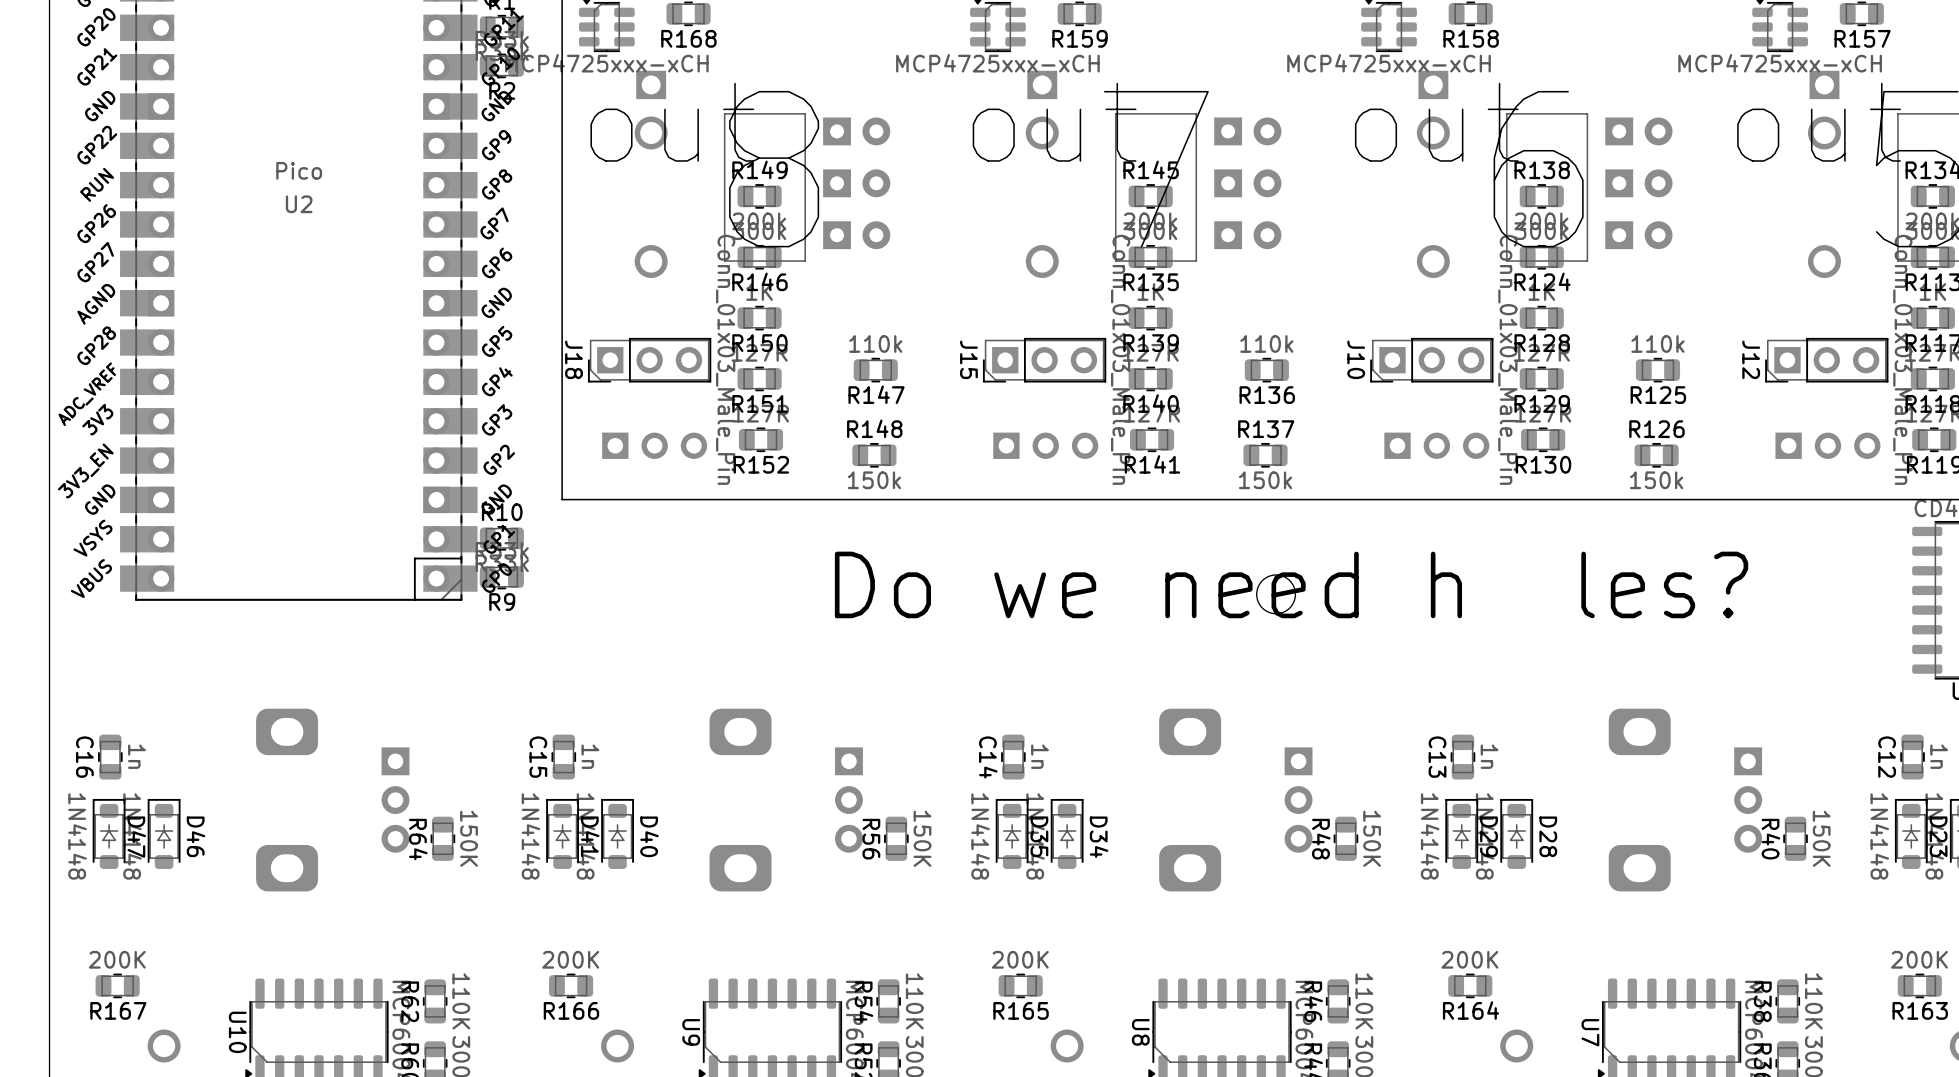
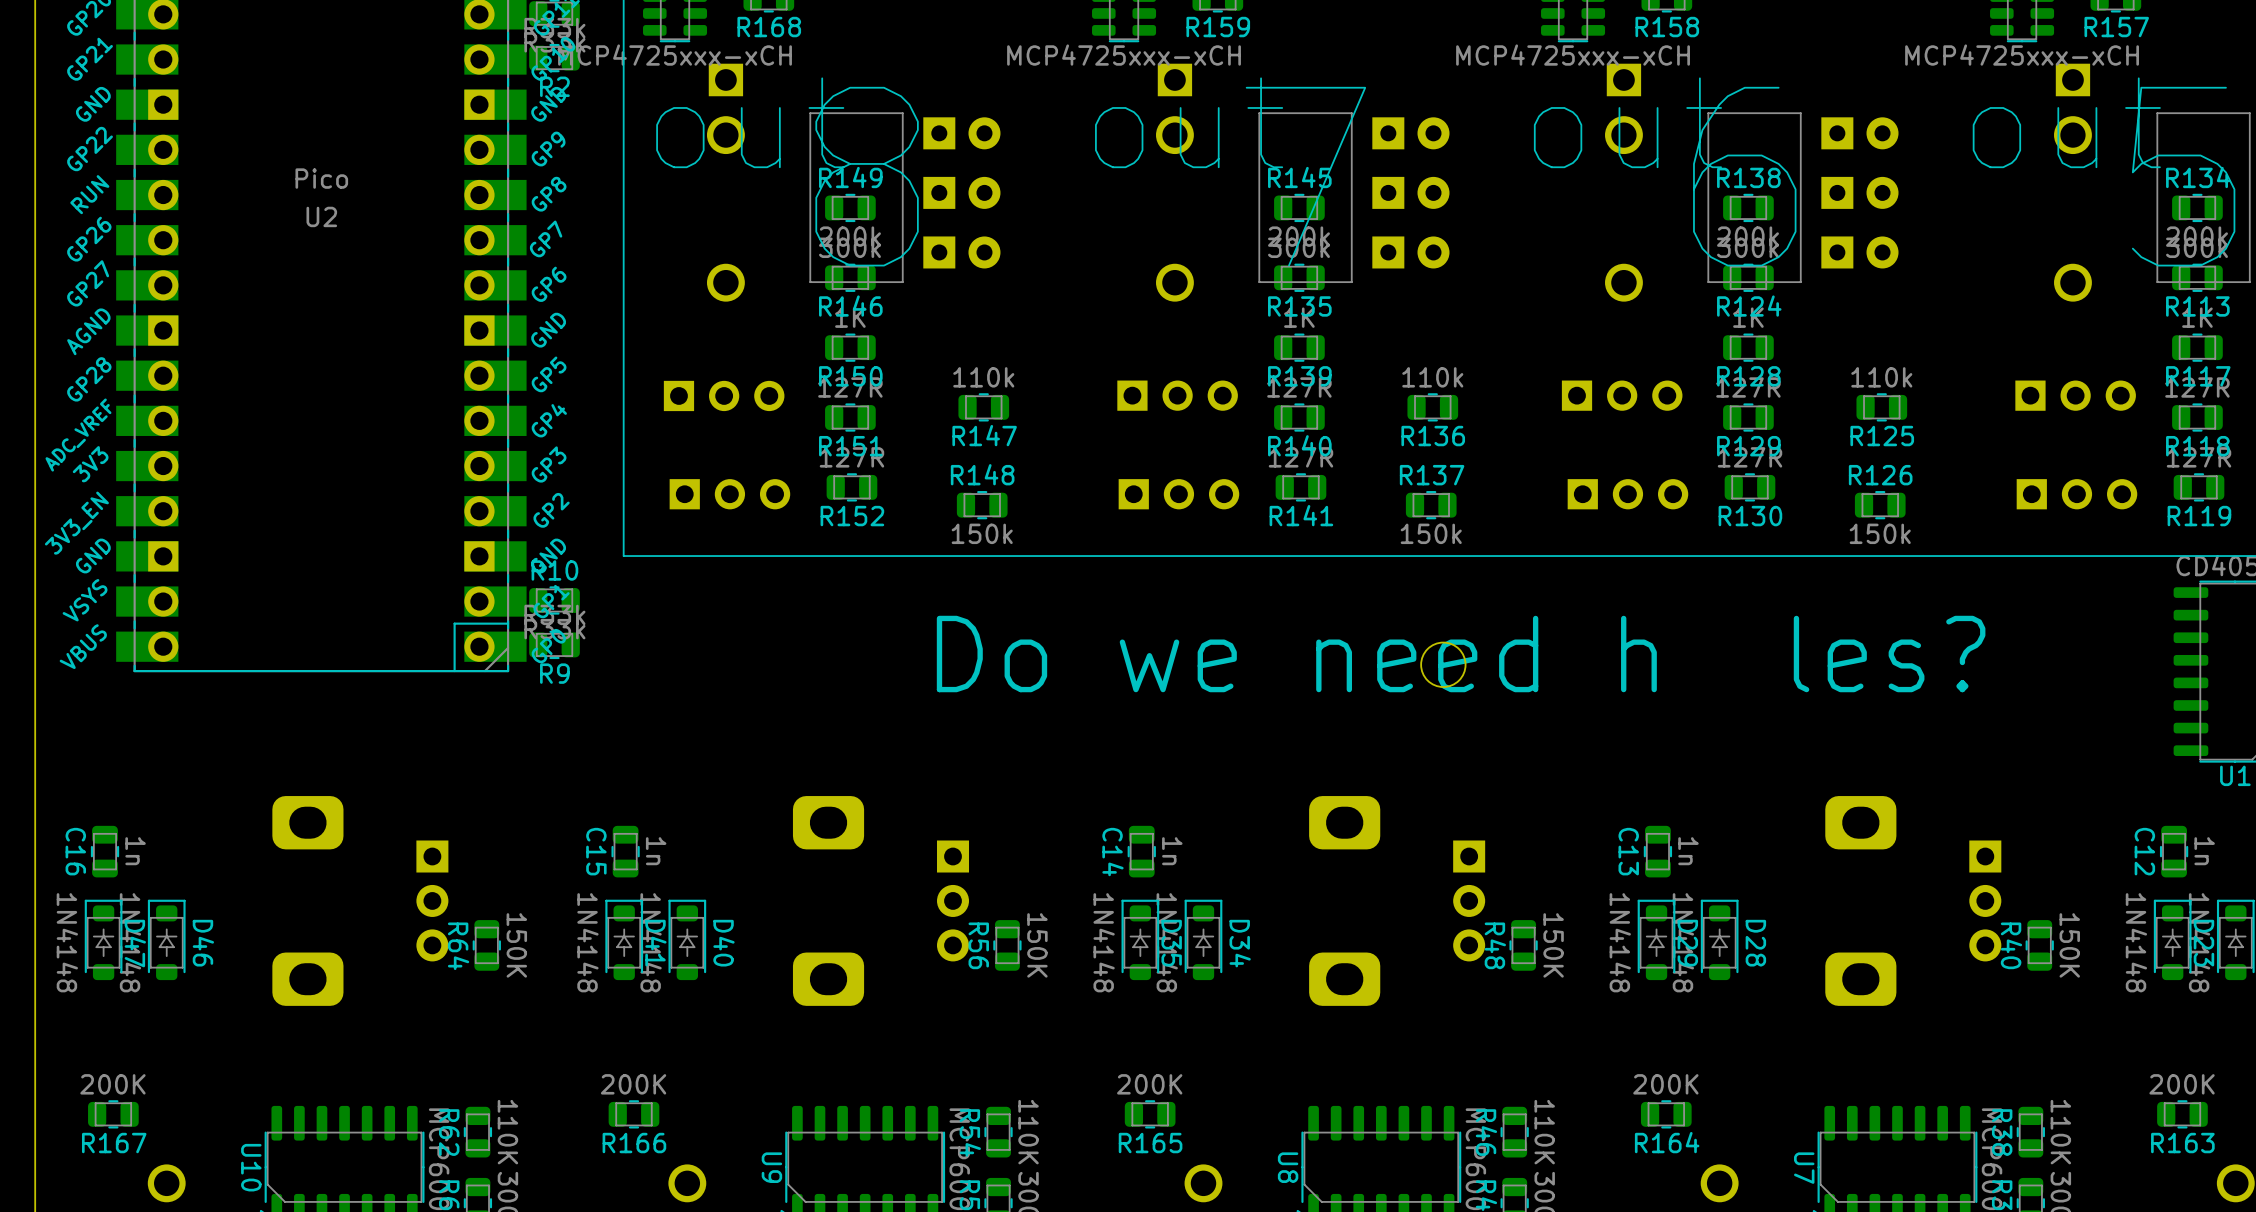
J18 side: bottom (649, 360) -> top (724, 395)
J15 side: bottom (1044, 360) -> top (1177, 395)
J10 side: bottom (1431, 360) -> top (1622, 395)
J12 side: bottom (1826, 360) -> top (2075, 395)

